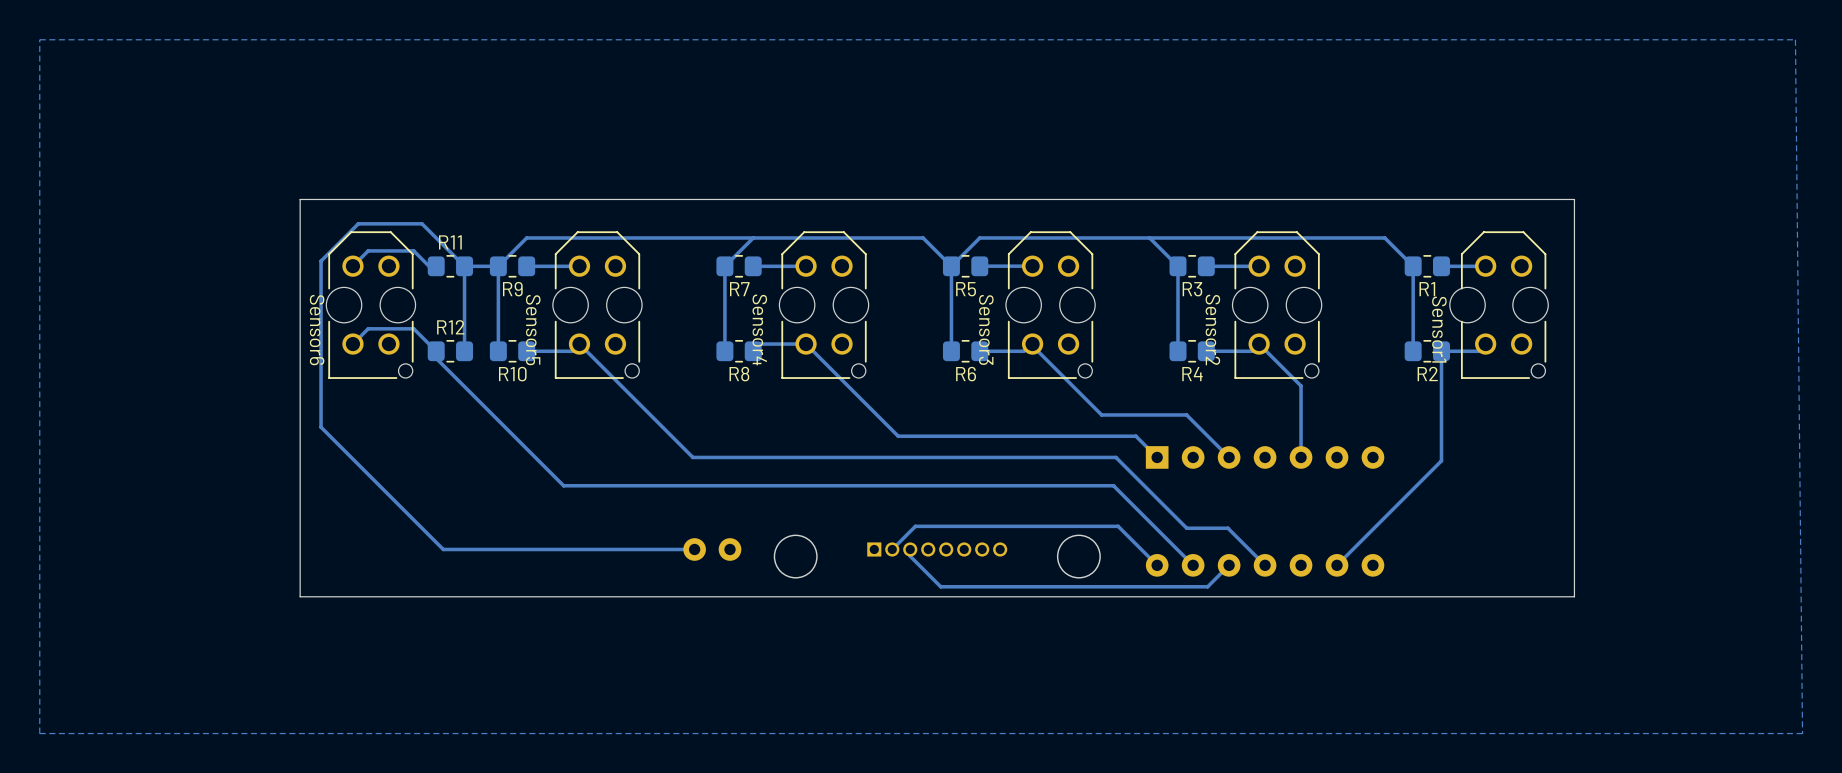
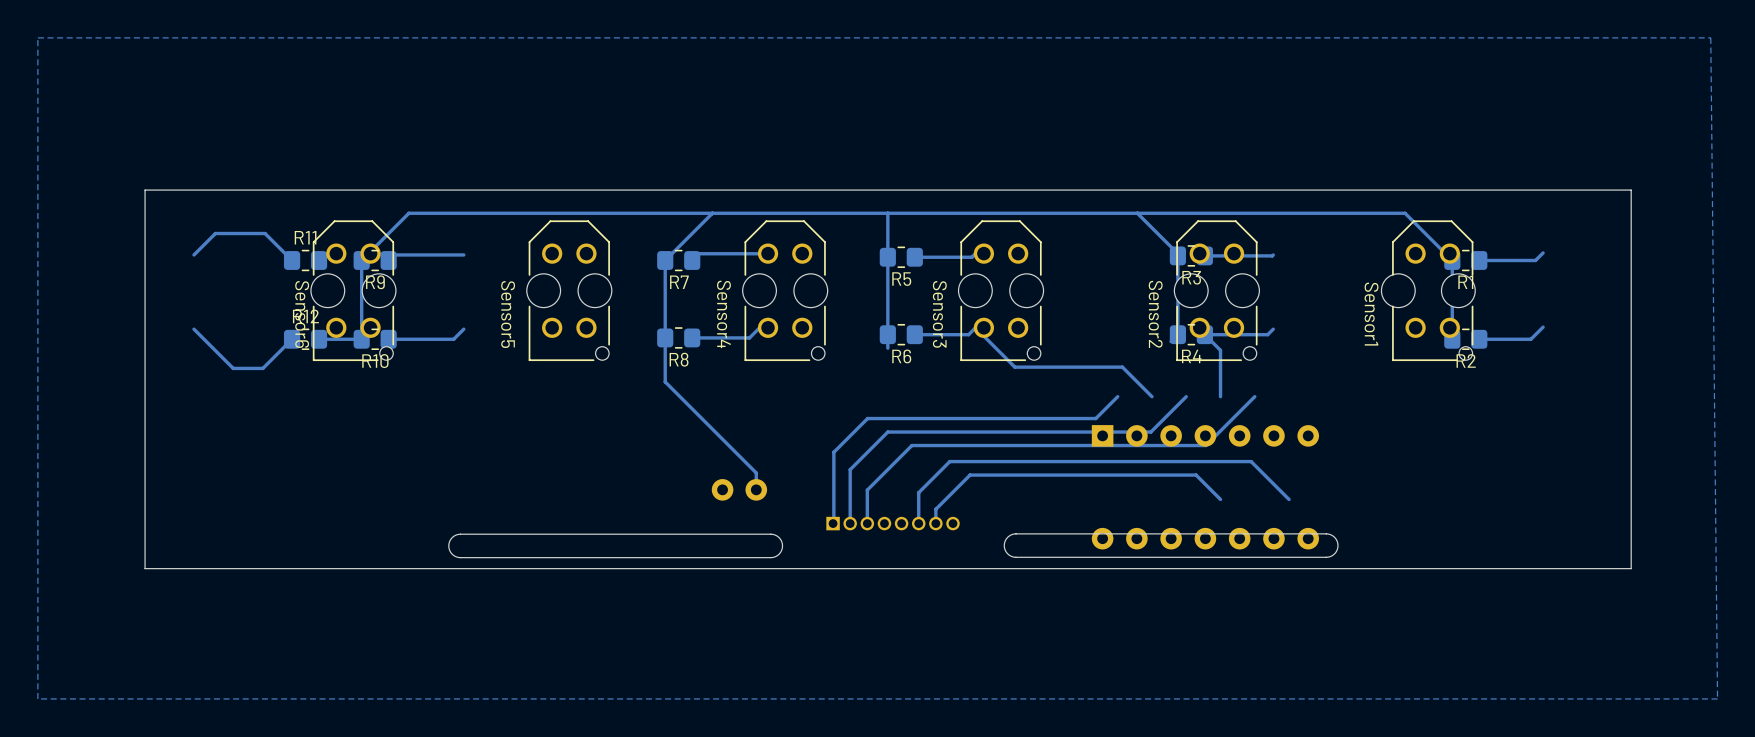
board edge: (300, 199) (300, 596) -> (285, 190) (145, 190) (145, 568) (285, 568)
board edge: (1574, 199) (1574, 596) -> (1500, 190) (1631, 190) (1631, 568) (1500, 568)
track: none -> (712, 213) (665, 260) (665, 381) (756, 472) (756, 489)
track: none -> (887, 213) (887, 348)
track: none -> (1137, 213) (1177, 253) (1177, 334) (1171, 341)
track: (753, 237) (724, 266) (724, 351) -> none
track: (1149, 237) (1177, 266) (1177, 351) -> none
track: none -> (1543, 252) (1535, 260) (1479, 260)
track: (352, 266) (368, 250) (413, 250) (429, 266) (436, 266) -> none
R11 position: (450, 266) -> (305, 260)
track: (464, 266) (464, 351) -> none
track: (464, 266) (422, 223) (358, 223) (321, 261) (321, 427) (443, 549) (694, 549) -> none
track: (498, 266) (464, 266) -> none
track: (498, 266) (498, 351) -> none
R9 position: (512, 266) -> (375, 260)
track: (579, 266) (526, 266) -> none
R7 position: (739, 266) -> (678, 260)
track: none -> (717, 253) (698, 253) (692, 260)
track: (951, 266) (979, 237) (1384, 237) (1413, 266) (1413, 351) -> none
track: (951, 266) (923, 237) (526, 237) (498, 266) -> none
track: (951, 266) (951, 351) -> none
R5 position: (965, 266) -> (901, 257)
track: none -> (975, 253) (971, 257) (914, 257)
track: (1032, 266) (979, 266) -> none
R3 position: (1192, 266) -> (1191, 255)
track: (1258, 266) (1206, 266) -> none
R1 position: (1427, 266) -> (1465, 260)
track: (1485, 266) (1441, 266) -> none
track: none -> (193, 254) (215, 233) (265, 233) (292, 260)
track: none -> (463, 254) (394, 254) (388, 260)
track: none -> (1273, 254) (1204, 255)
track: none -> (1543, 327) (1530, 339) (1479, 339)
track: (352, 344) (368, 328) (413, 328) (436, 351) (436, 358) (563, 485) (1113, 485) (1193, 565) -> none
track: none -> (759, 327) (749, 337) (692, 337)
track: (1485, 344) (1478, 351) (1441, 351) (1441, 460) (1337, 565) -> none
track: none -> (193, 329) (233, 368) (262, 368) (292, 339)
track: none -> (463, 329) (453, 339) (388, 339)
track: none -> (1273, 329) (1267, 334) (1204, 334) (1220, 350) (1220, 396)
R12 position: (450, 351) -> (305, 339)
R10 position: (512, 351) -> (375, 339)
track: (526, 351) (572, 351) (579, 344) (692, 457) (1115, 457) (1186, 528) (1227, 528) (1265, 565) -> none
R8 position: (739, 351) -> (678, 337)
track: (753, 351) (760, 344) (806, 344) (898, 436) (1135, 436) (1157, 457) -> none
R6 position: (965, 351) -> (901, 334)
track: none -> (933, 334) (914, 334)
track: (1016, 351) (1023, 351) (1032, 344) (1101, 414) (1186, 414) (1229, 457) -> (968, 334) (975, 327) (1014, 367) (1122, 367) (1151, 396)
R4 position: (1192, 351) -> (1191, 334)
track: (1206, 351) (1251, 351) (1259, 344) (1301, 385) (1301, 457) -> none
R2 position: (1427, 351) -> (1465, 339)
track: none -> (1452, 339) (1452, 260) (1405, 213) (408, 213) (361, 260) (361, 339) (319, 339)
track: none -> (1117, 396) (1095, 418) (867, 418) (833, 452) (833, 523)
track: none -> (1220, 499) (1196, 475) (970, 475) (935, 509) (935, 523)
track: none -> (1289, 499) (1251, 461) (949, 461) (918, 492) (918, 523)
round board edge: [773, 534, 818, 579] -> none
round board edge: [1056, 534, 1101, 579] -> none
part position: (712, 549) -> (739, 489)
track: (892, 549) (915, 526) (1118, 526) (1157, 565) -> (850, 523) (850, 469) (887, 432) (1150, 432) (1186, 396)
track: (910, 549) (910, 556) (940, 586) (1207, 586) (1229, 565) -> (867, 523) (867, 490) (911, 445) (1205, 445) (1254, 396)
board edge: none -> (770, 534) (460, 534) (451, 538) (448, 545) (451, 553) (460, 557) (770, 557) (778, 554) (782, 545) (779, 538) (770, 534)
board edge: none -> (1326, 533) (1016, 533) (1007, 537) (1004, 545) (1007, 553) (1016, 557) (1326, 557) (1334, 553) (1338, 545) (1334, 537) (1326, 533)

